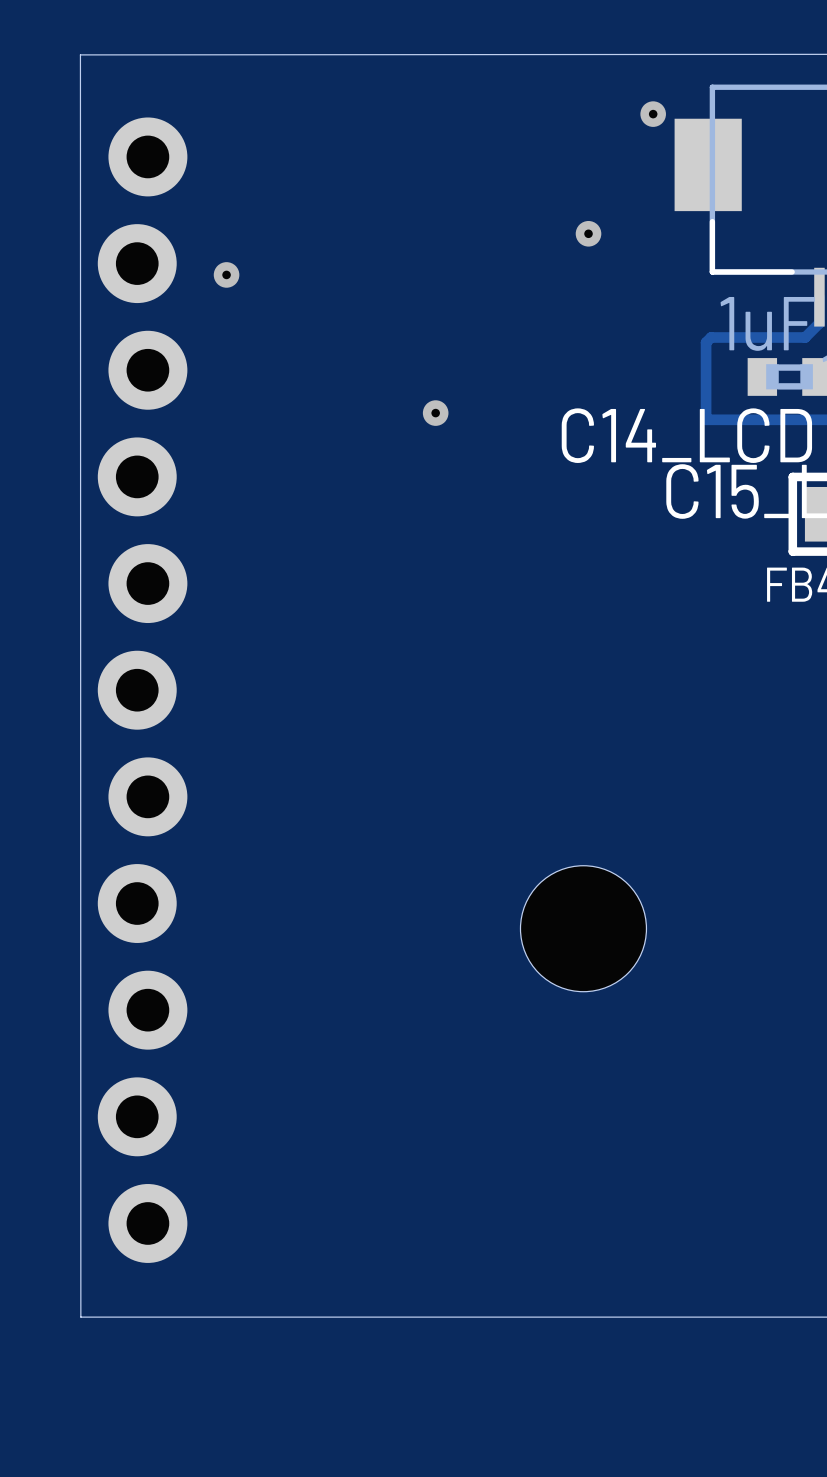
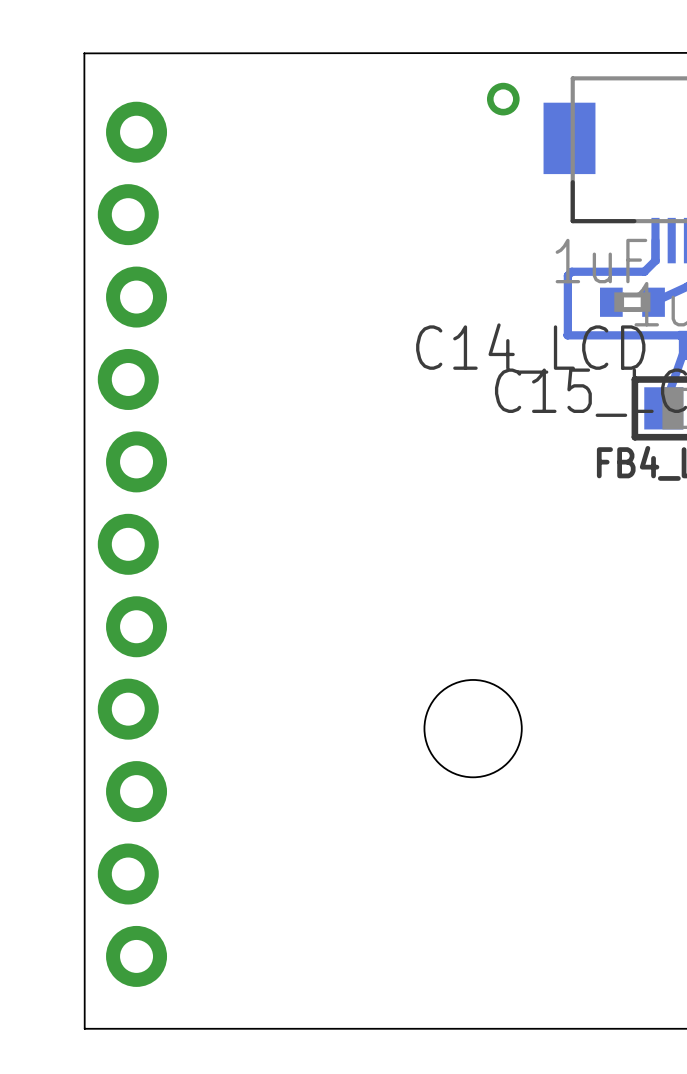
via size: [640, 101, 666, 127] -> [486, 82, 520, 116]
via: (588, 233) -> none
via: (226, 274) -> none
via: (435, 413) -> none

